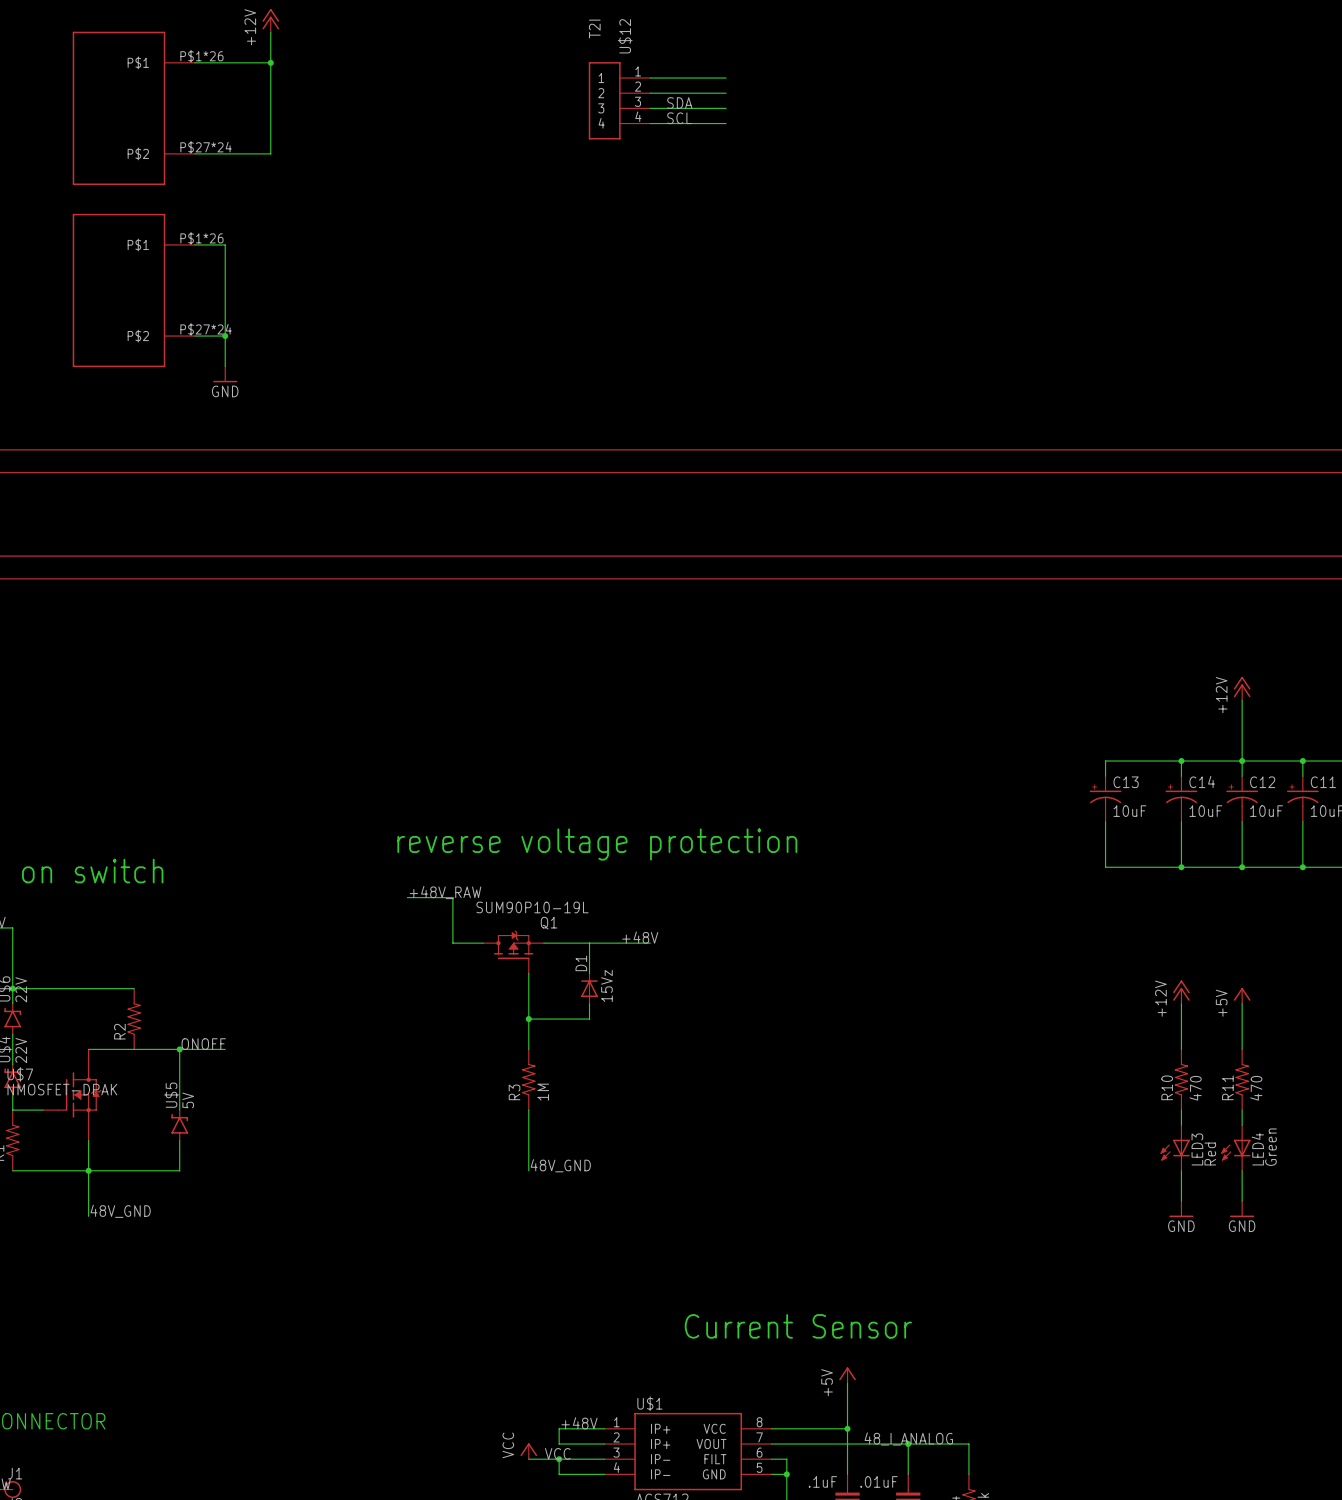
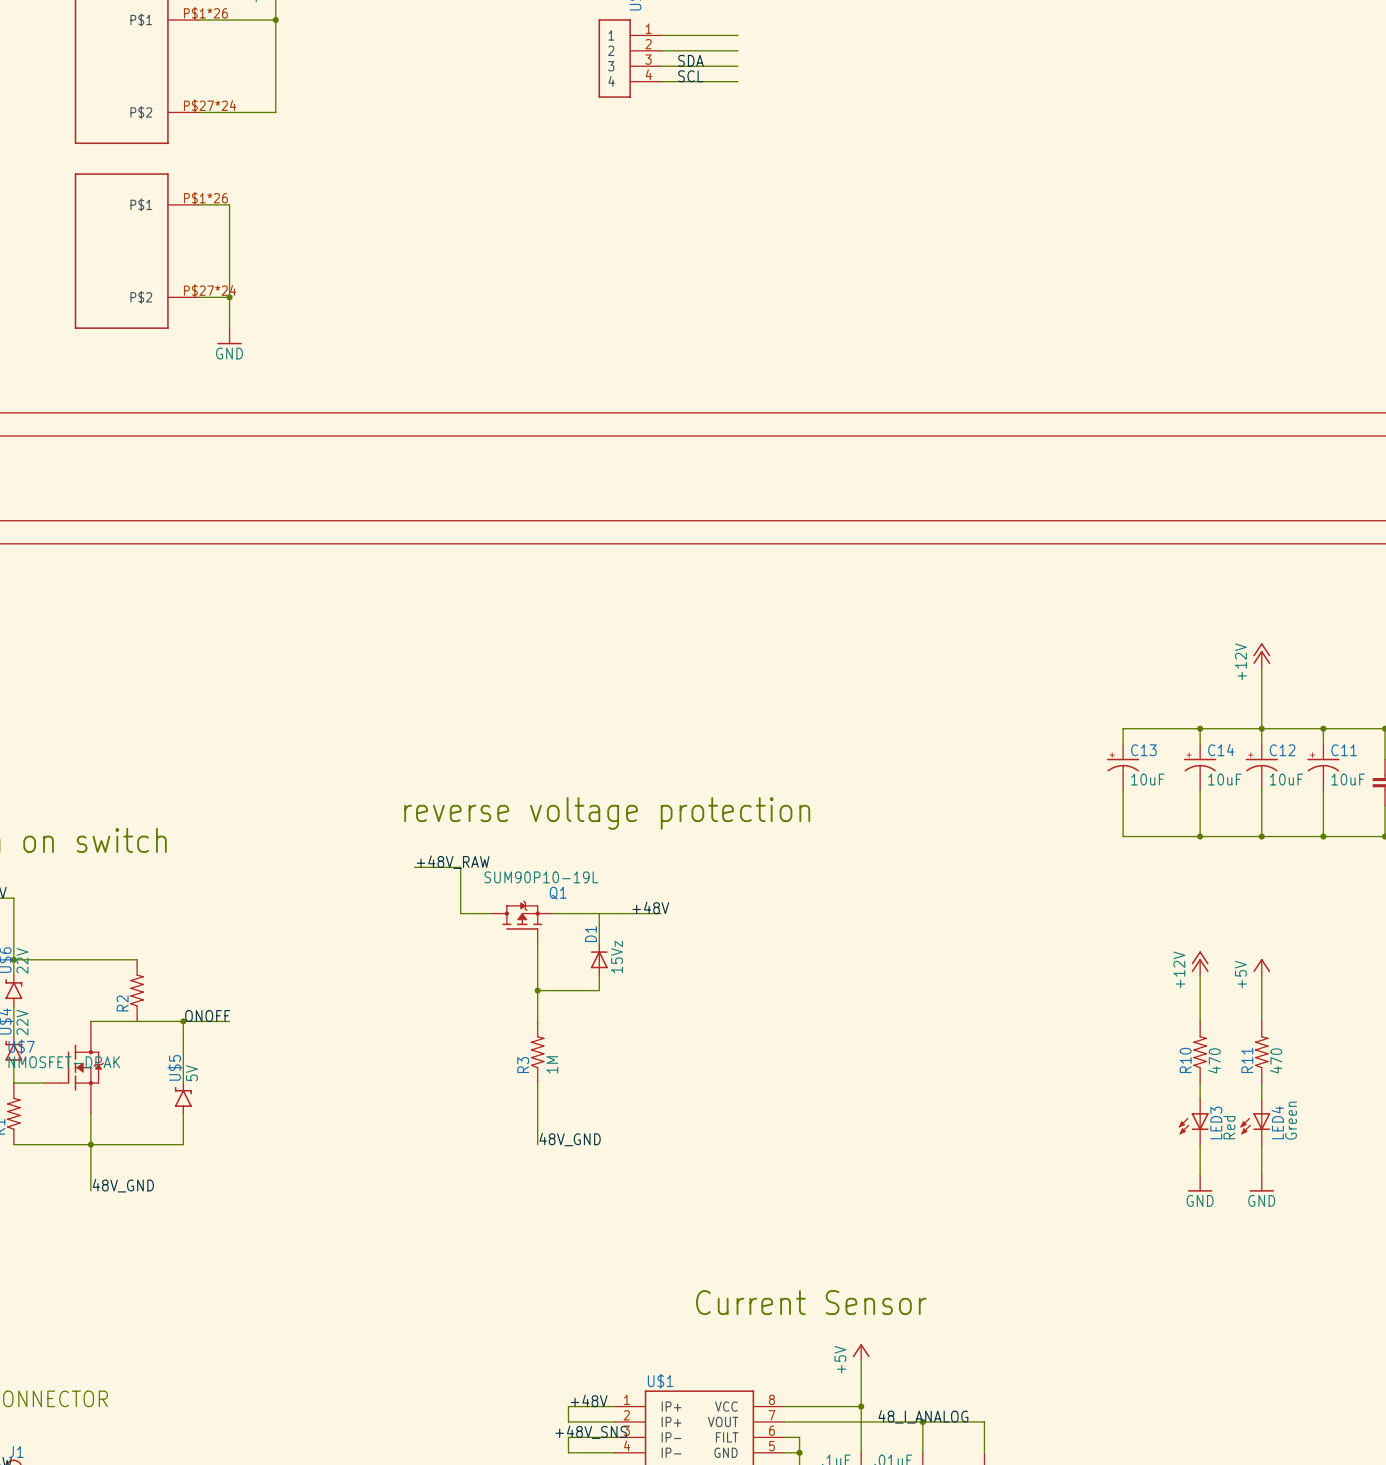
power symbol: VCC (528, 1451) -> none
label: VCC (557, 1453) -> +48V_SNS (591, 1432)
wire: (528, 1459) (559, 1459) -> none
junction: (559, 1459) -> none

